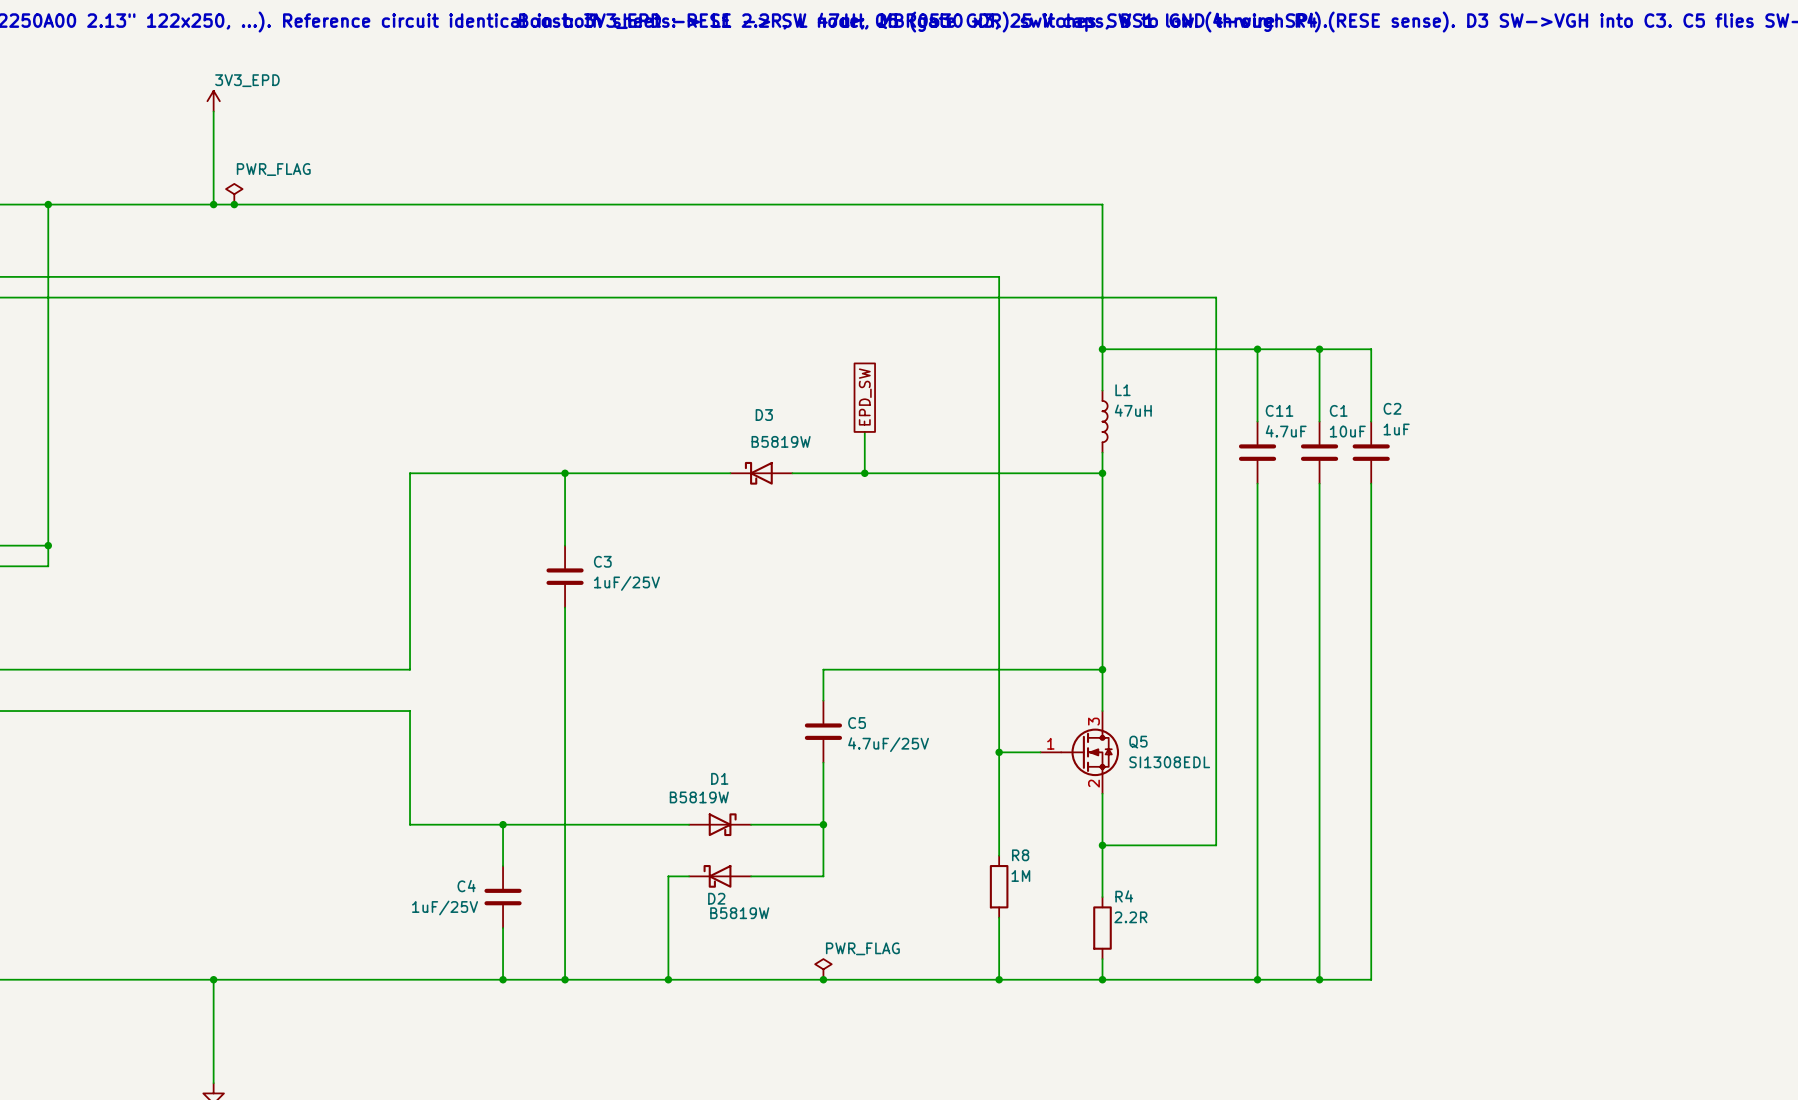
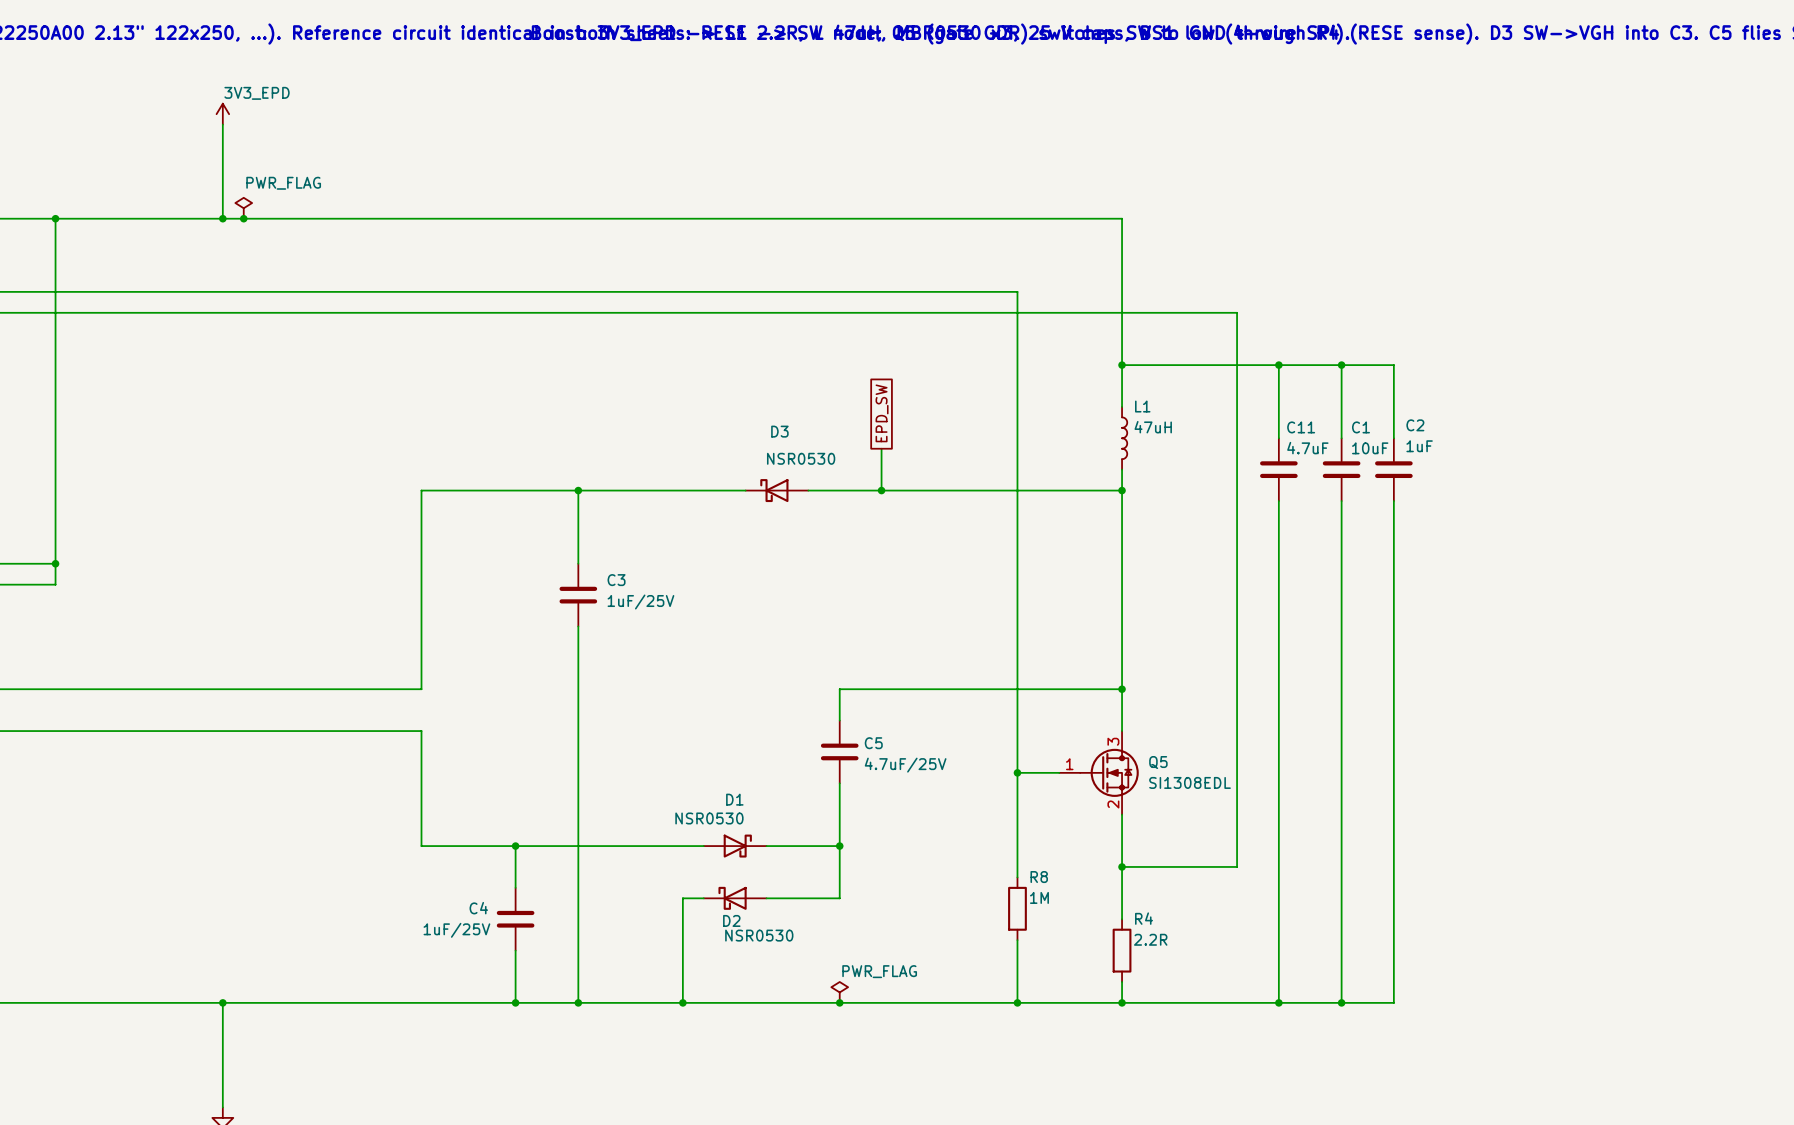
D3 value: B5819W (781, 441) -> NSR0530 (801, 458)
D1 value: B5819W (699, 797) -> NSR0530 (709, 818)
D2 value: B5819W (739, 913) -> NSR0530 (759, 935)

